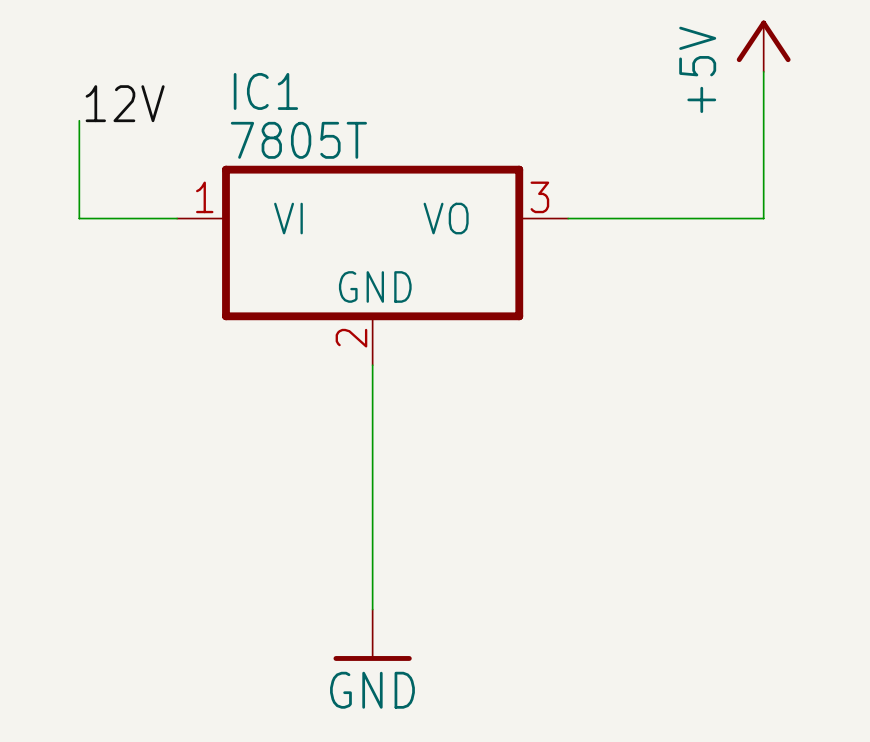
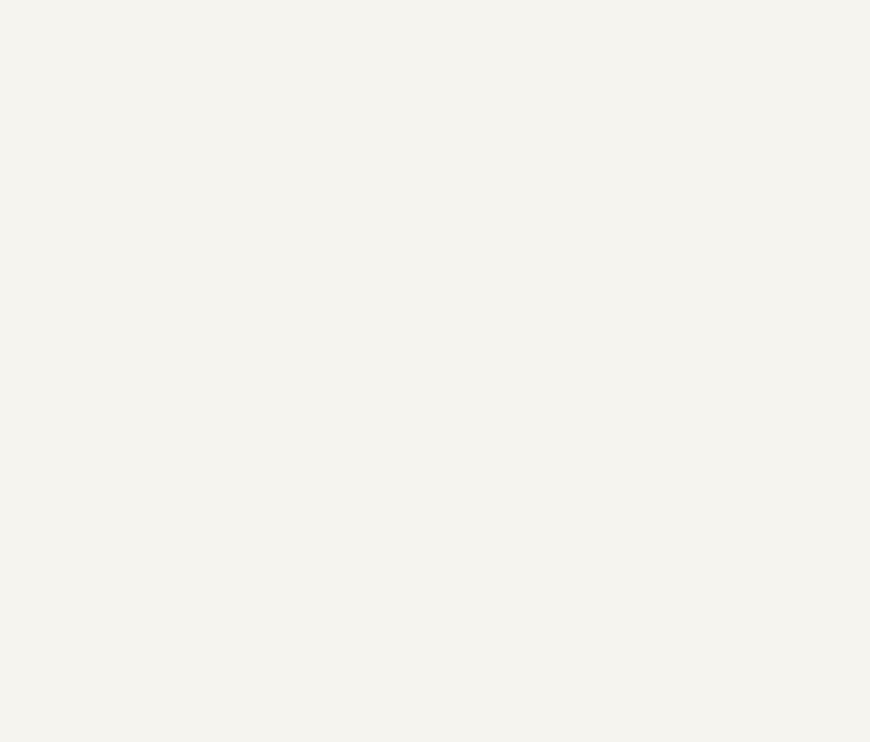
power symbol: +5V (763, 46) -> none
wire: (763, 71) (763, 218) (568, 218) -> none
label: 12V (125, 103) -> none
wire: (79, 120) (79, 218) (177, 218) -> none
IC1: 7805T (372, 265) -> none
wire: (372, 365) (372, 609) -> none
power symbol: GND (372, 635) -> none

